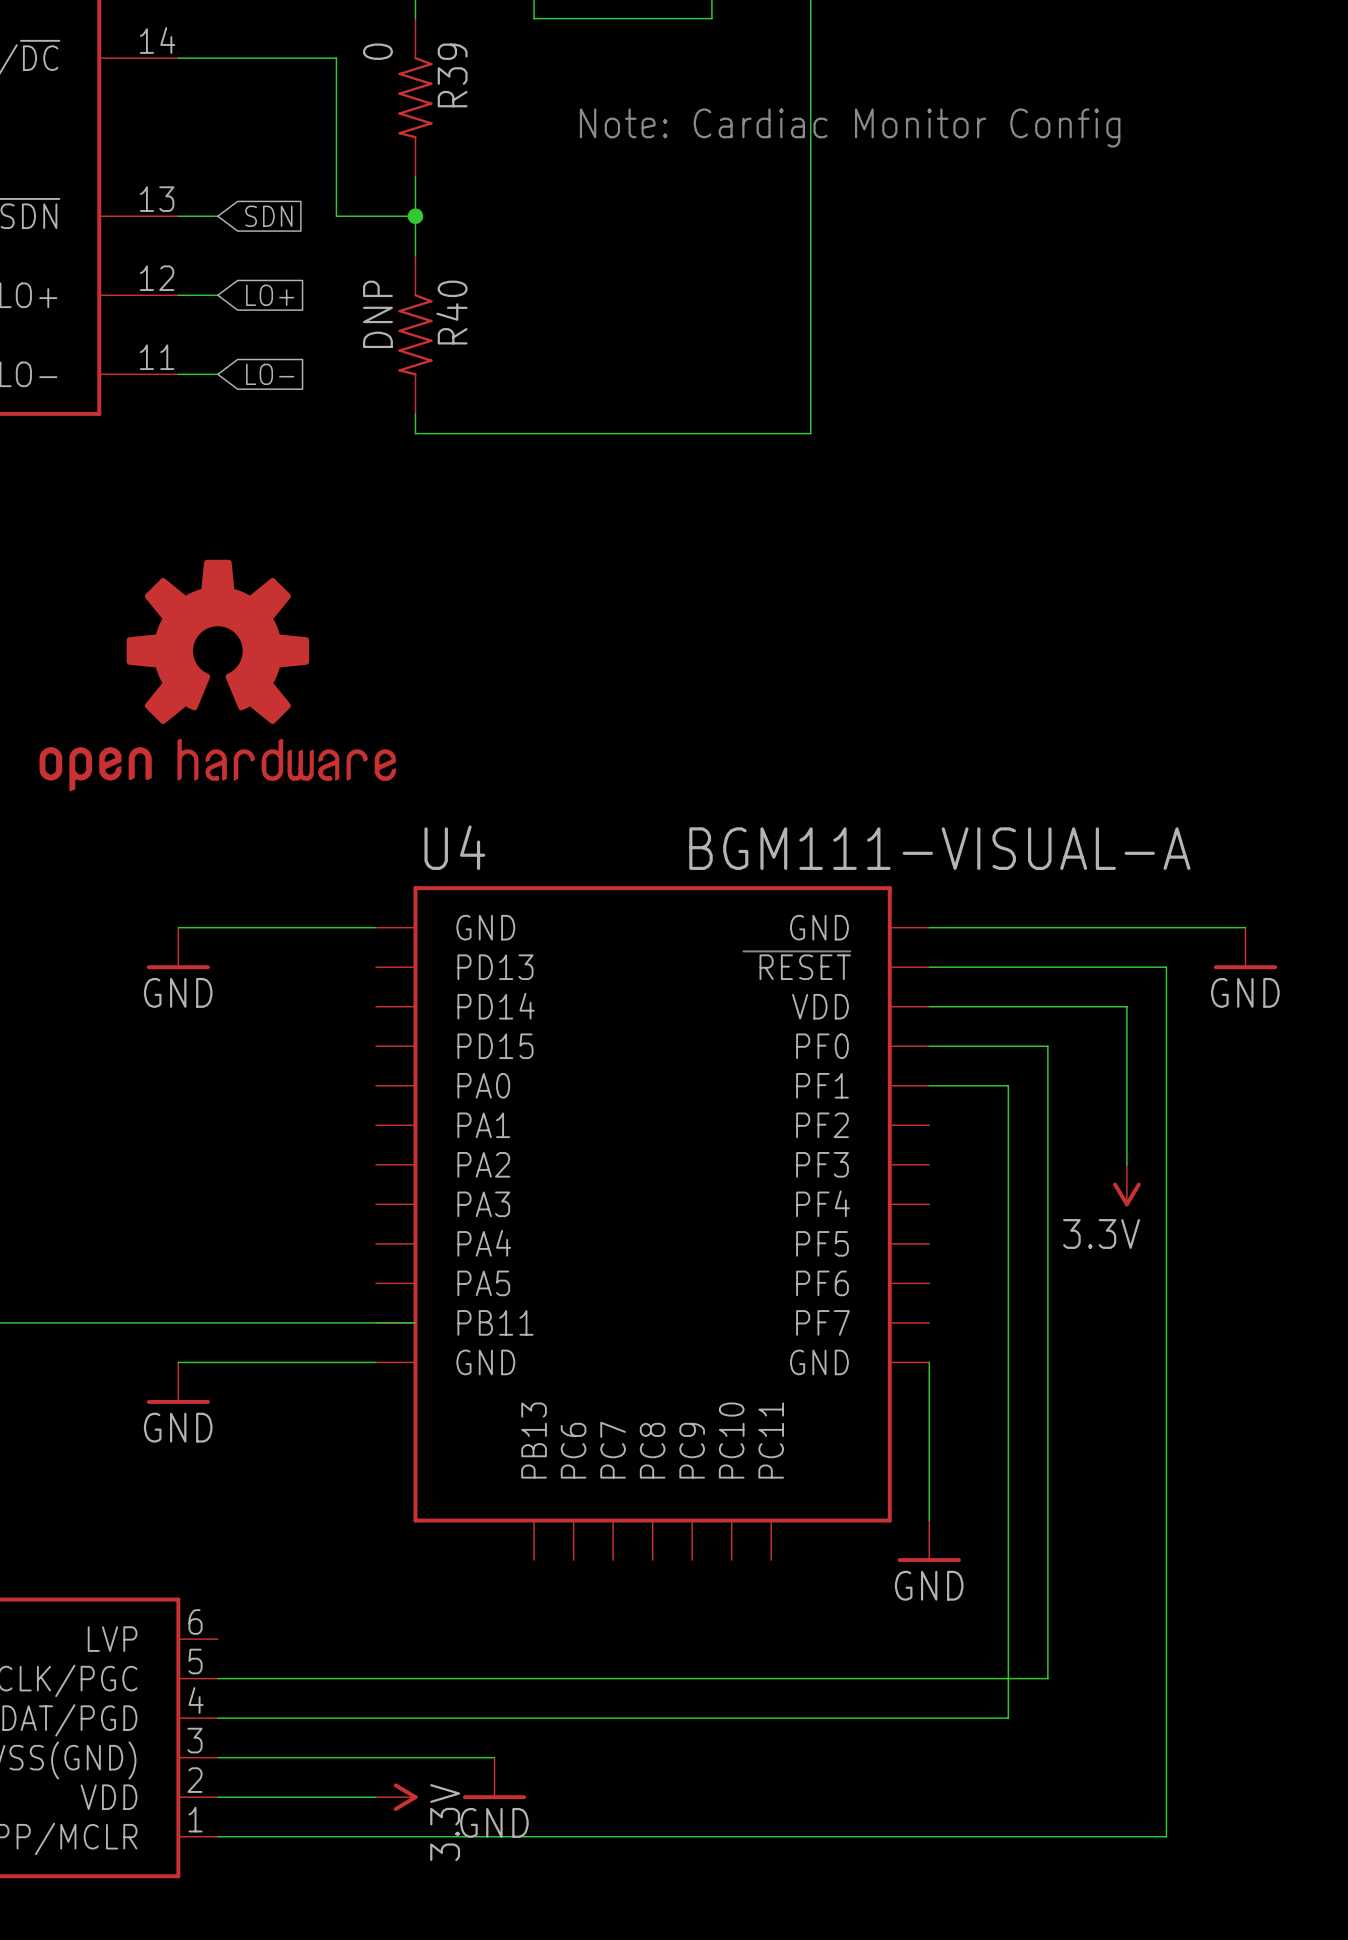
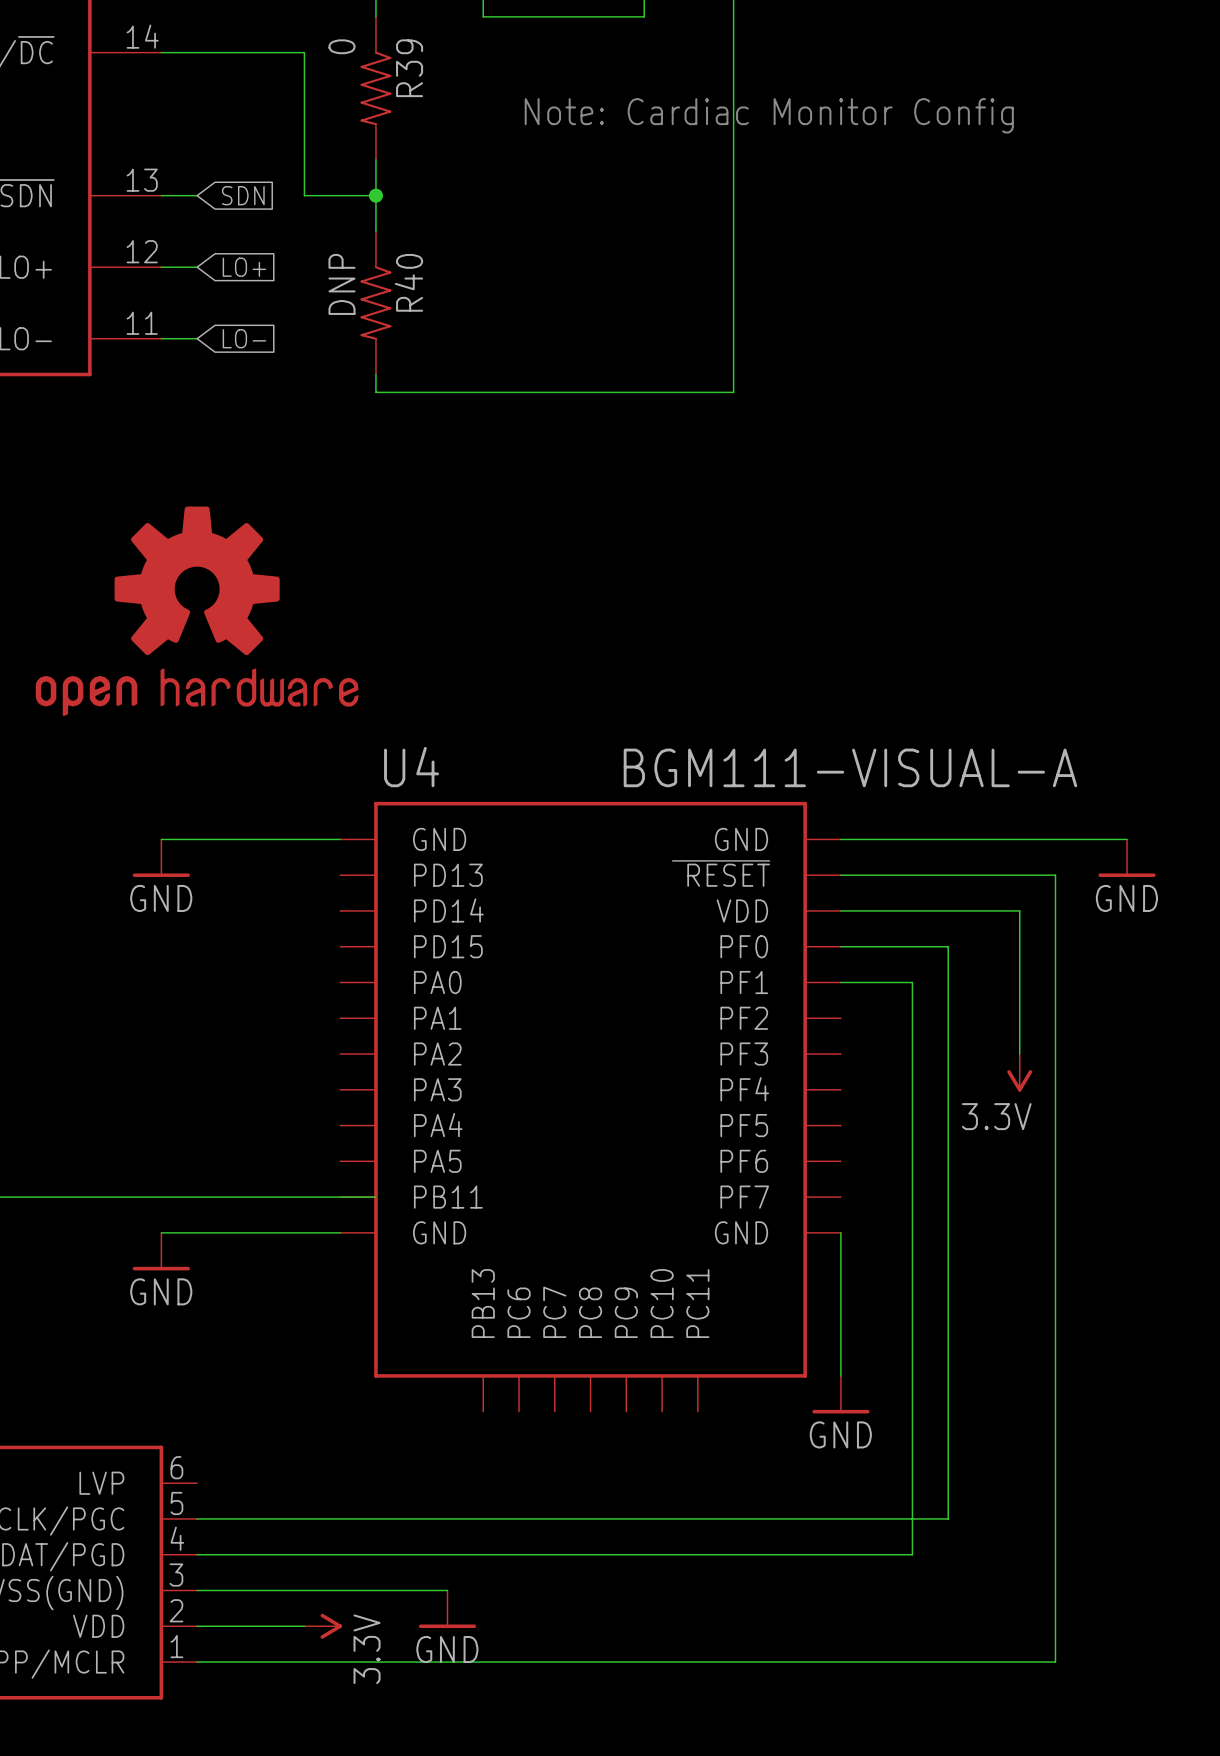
power symbol position: 3.3V (396, 1797) -> 3.3V (323, 1626)

